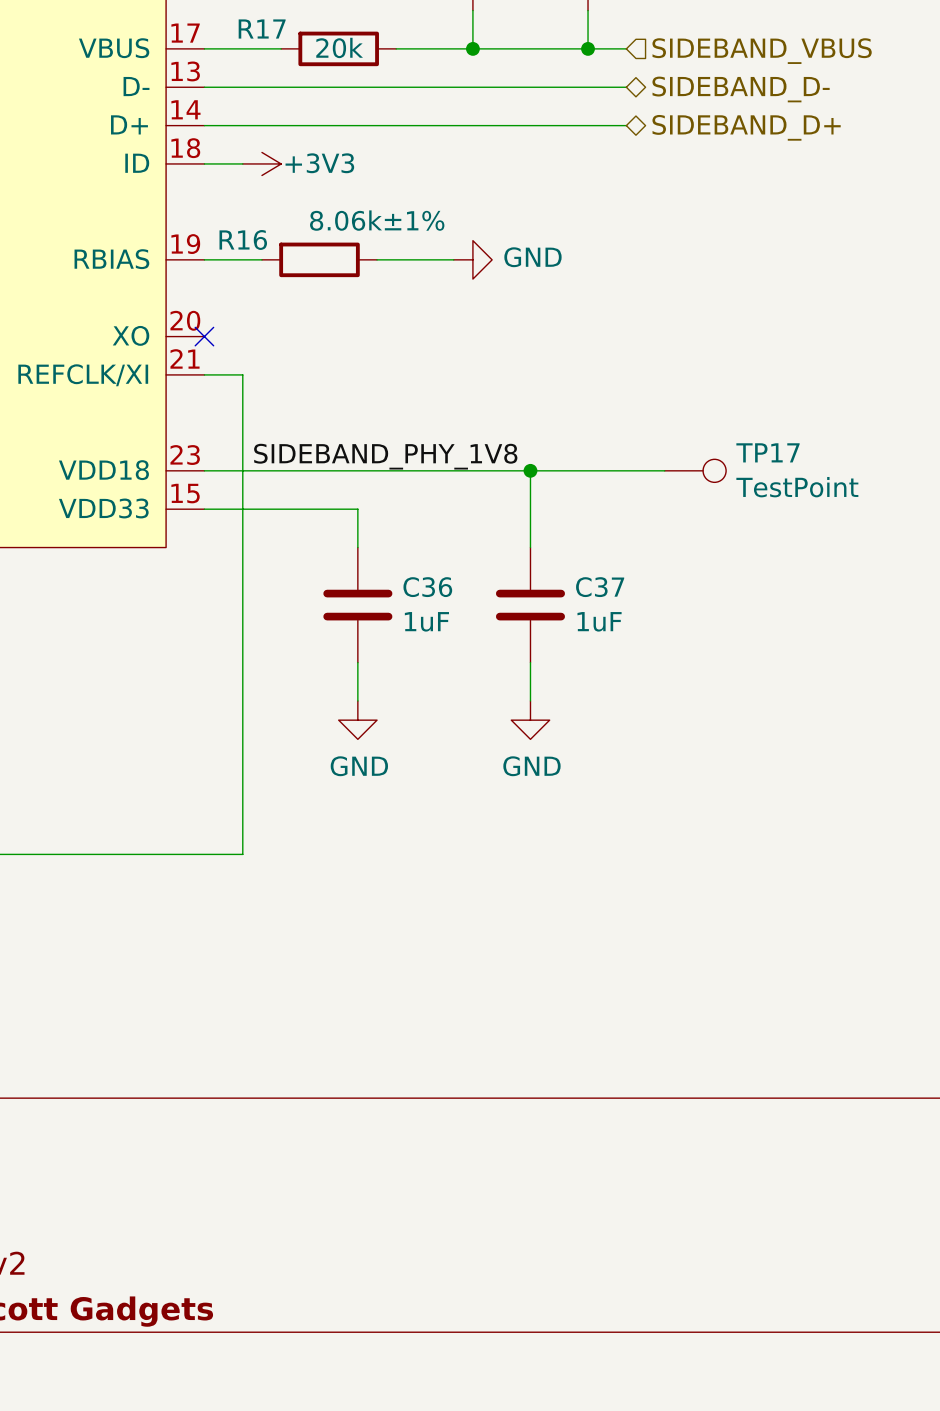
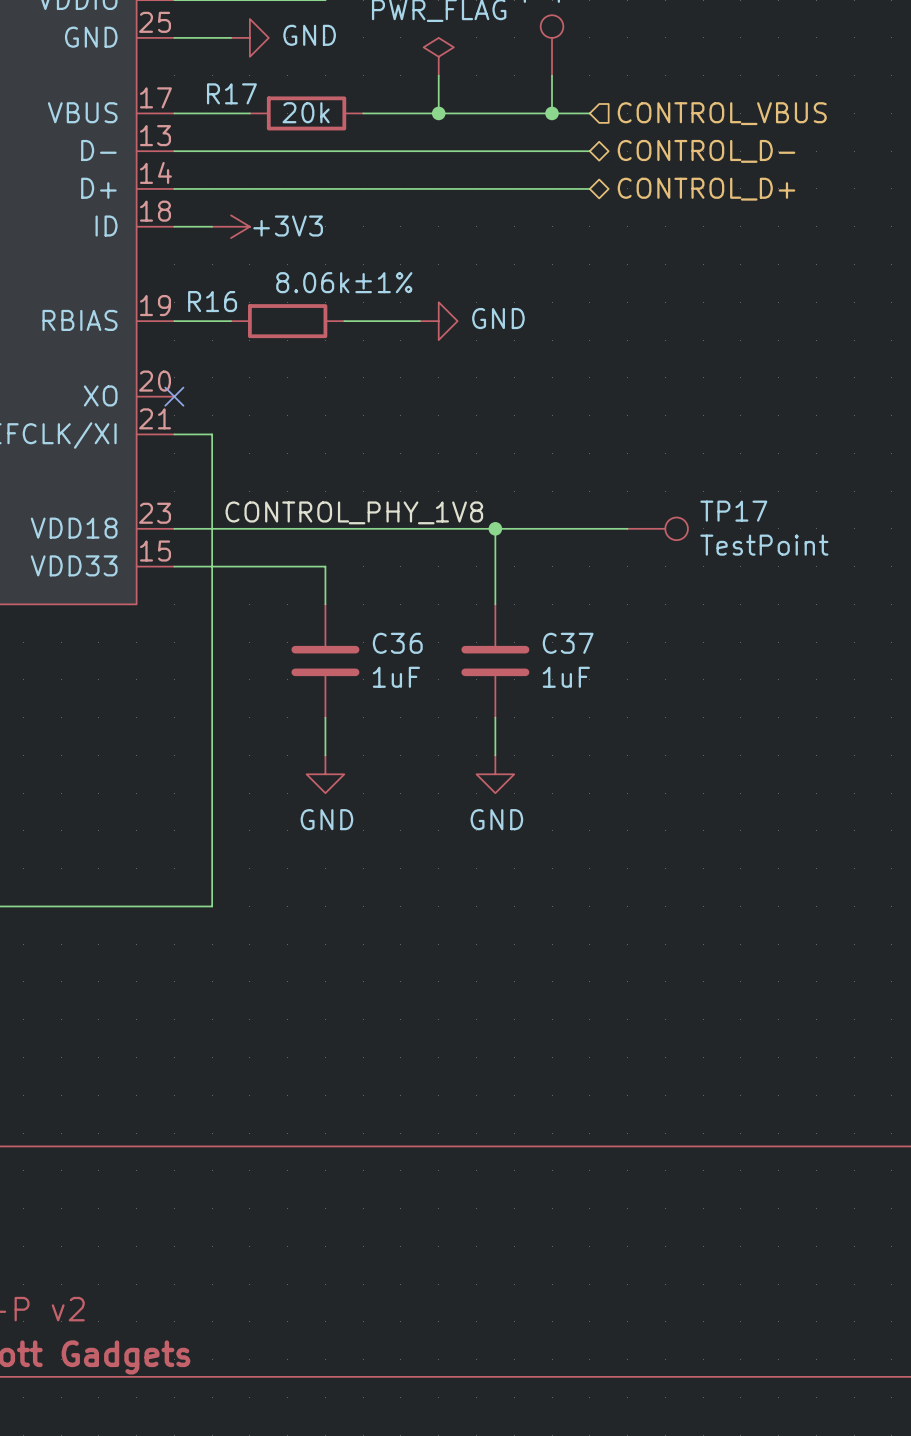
hierarchical label: SIDEBAND_VBUS (762, 51) -> CONTROL_VBUS (722, 113)
hierarchical label: SIDEBAND_D- (741, 89) -> CONTROL_D- (706, 151)
hierarchical label: SIDEBAND_D+ (746, 127) -> CONTROL_D+ (706, 189)
label: SIDEBAND_PHY_1V8 (385, 456) -> CONTROL_PHY_1V8 (354, 512)

